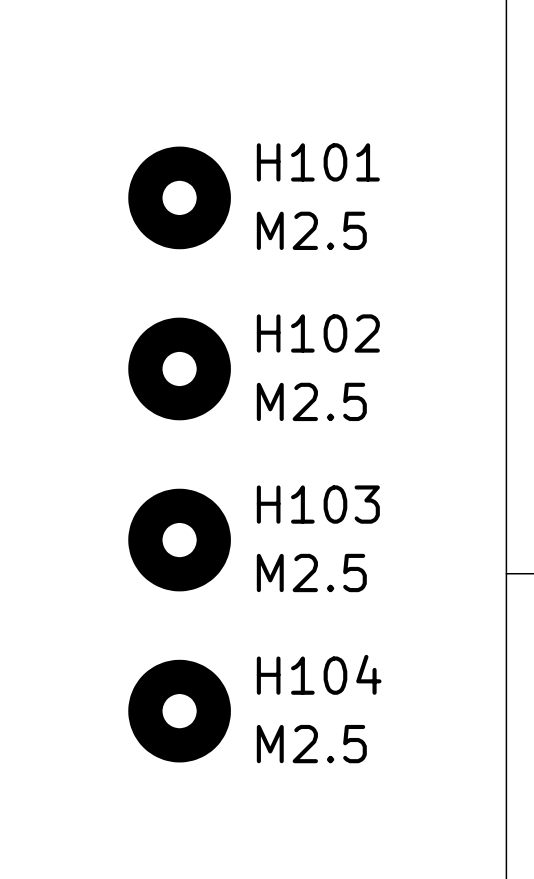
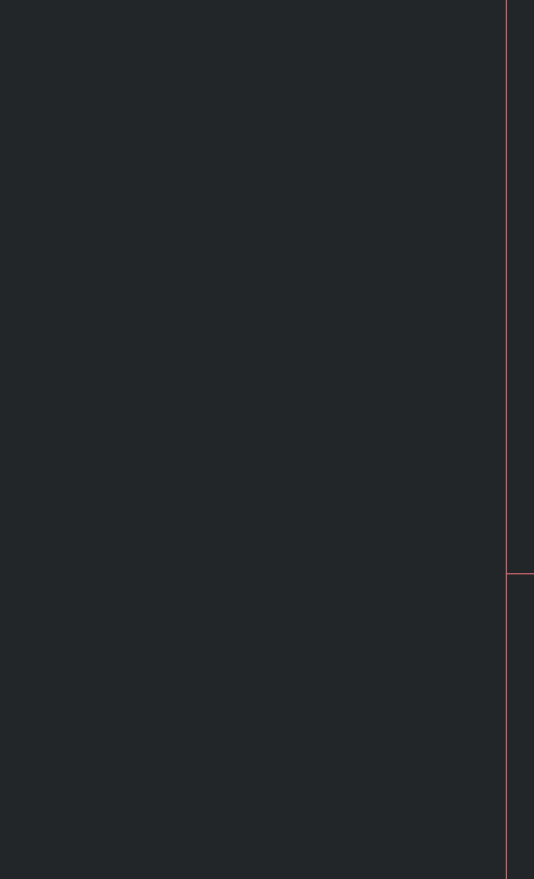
H101: M2.5 (179, 197) -> none
H102: M2.5 (179, 368) -> none
H103: M2.5 (179, 540) -> none
H104: M2.5 (179, 711) -> none

